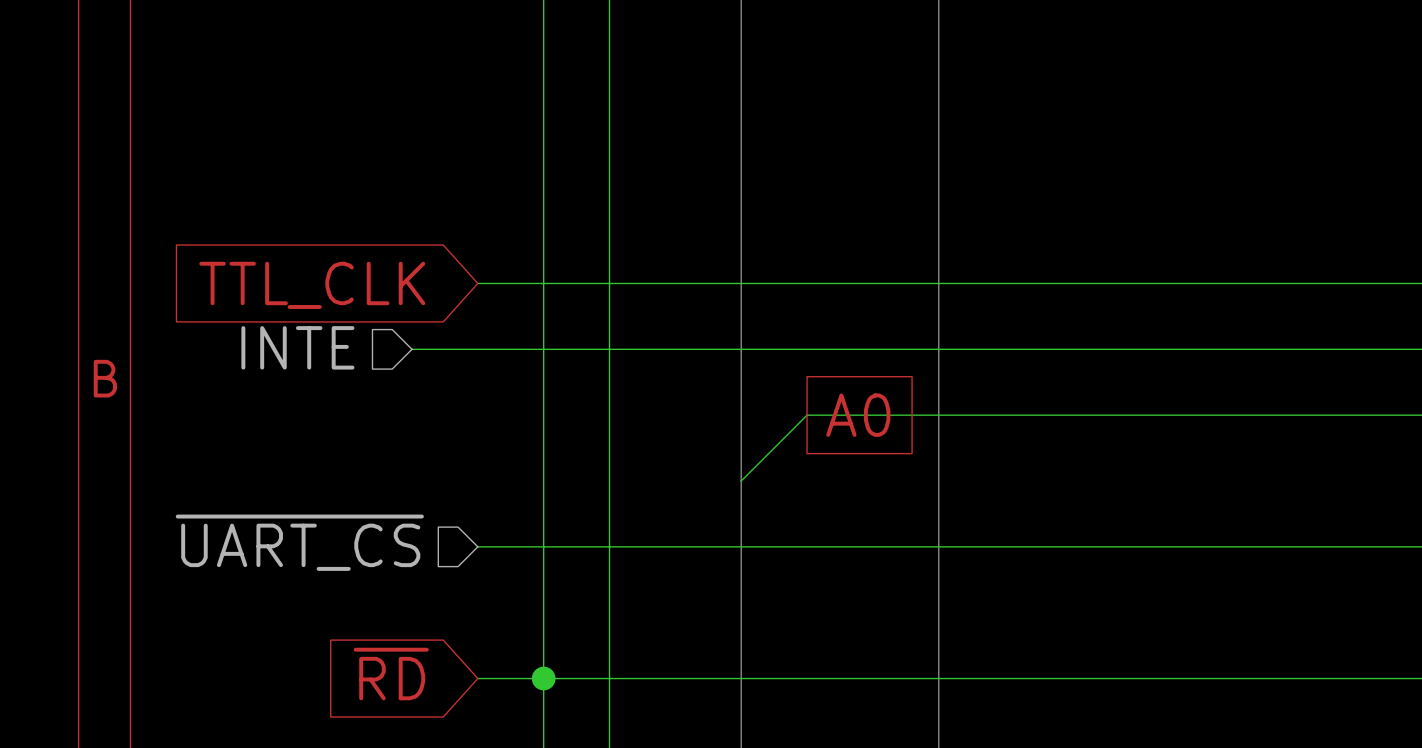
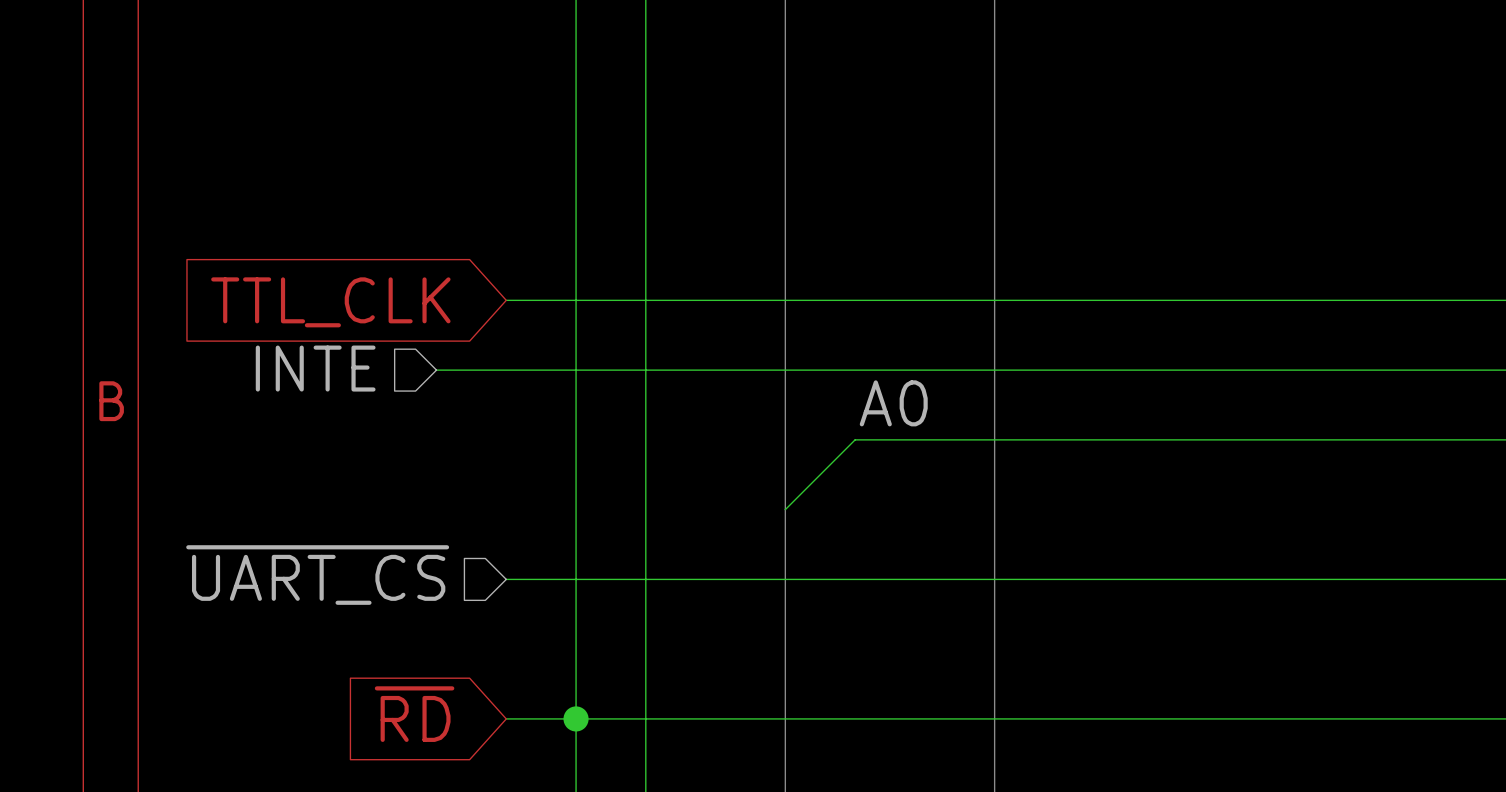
label: none -> A0 (893, 403)
global label: A0 (858, 415) -> none

